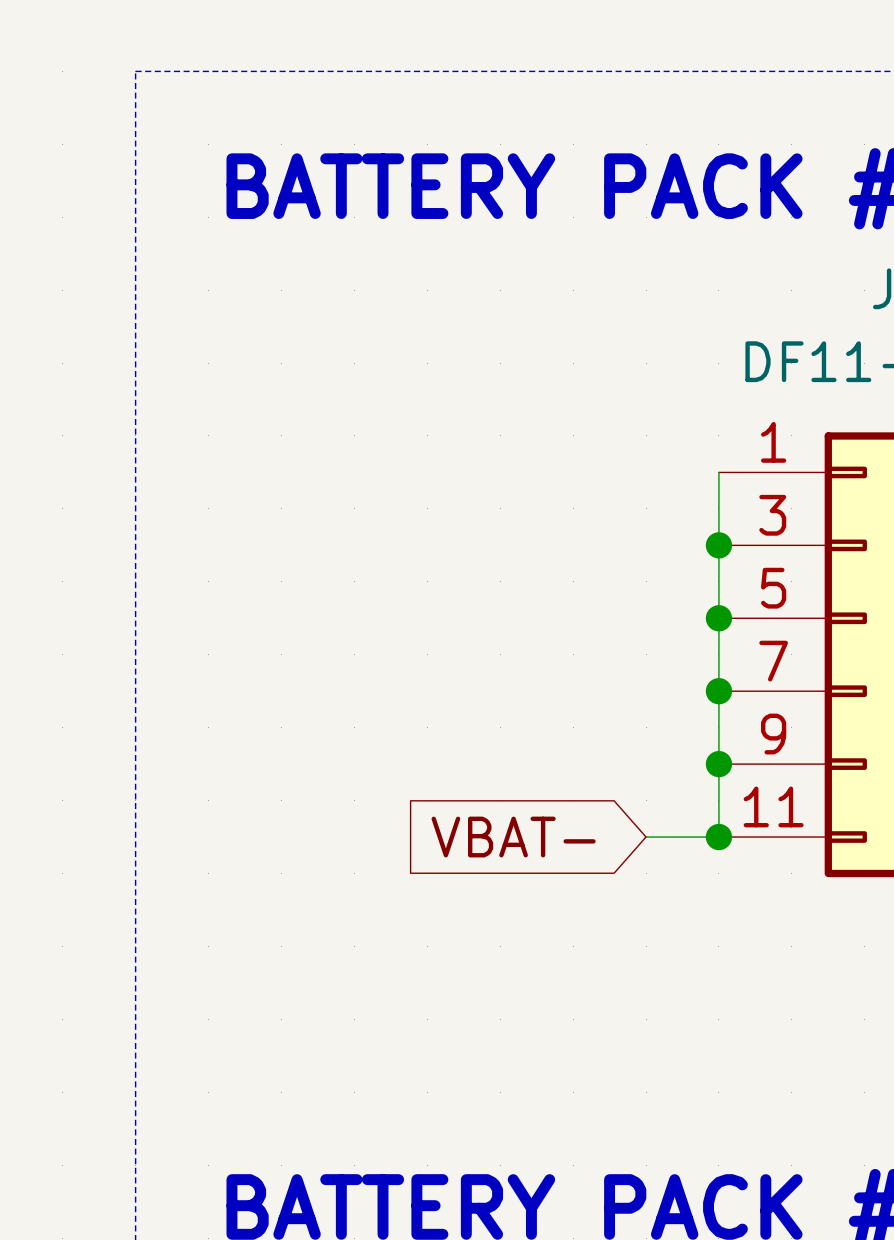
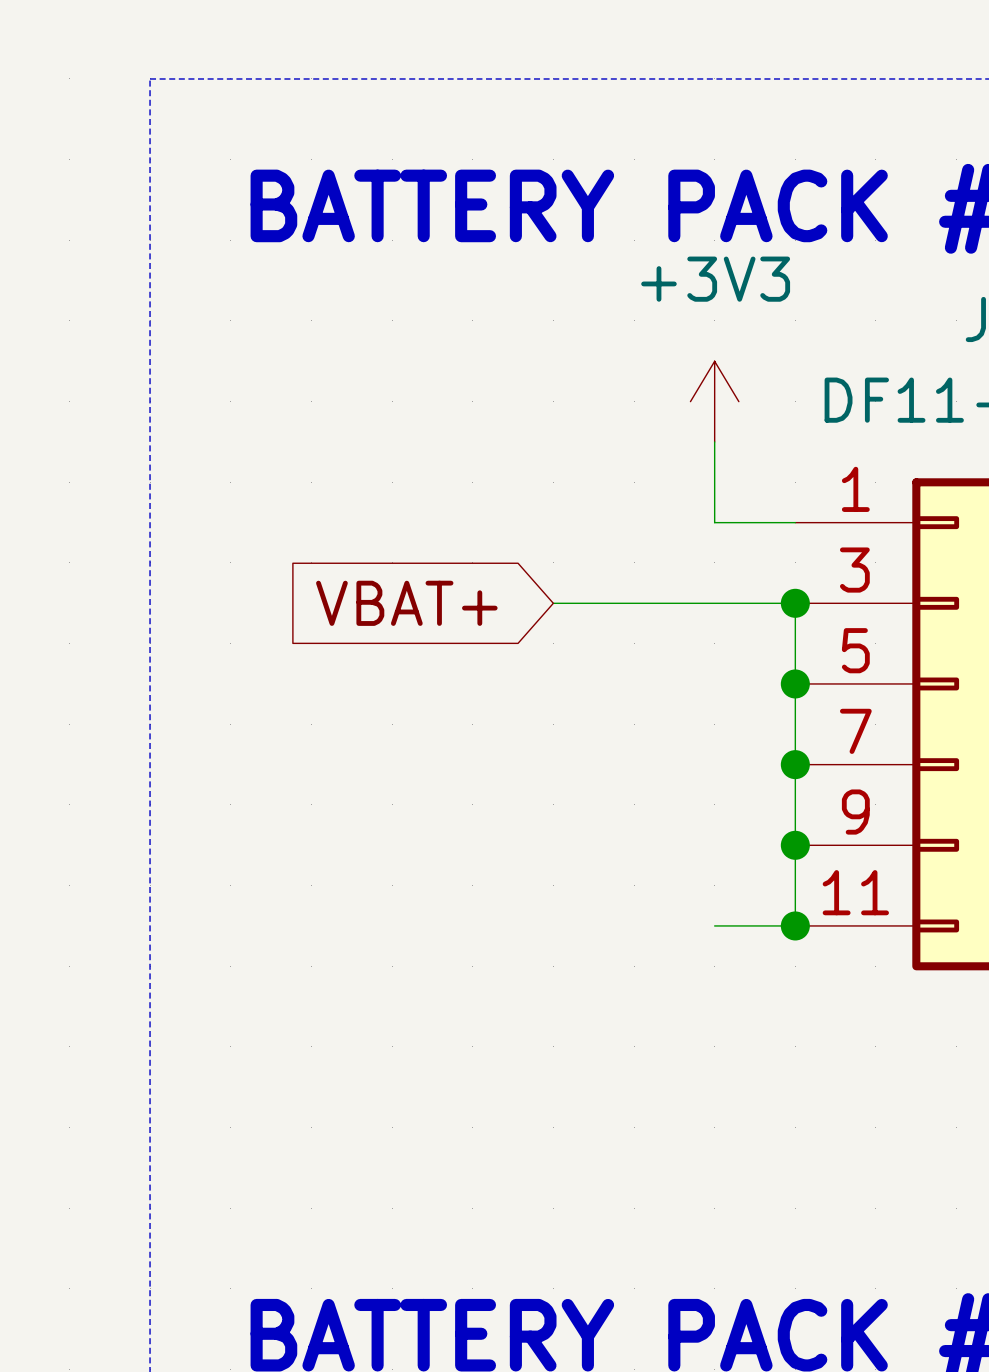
power symbol: none -> +3V3 (714, 401)
wire: (718, 472) (718, 545) -> (795, 522) (714, 522) (714, 441)
global label: none -> VBAT+ (406, 603)
wire: none -> (553, 603) (795, 603)
global label: VBAT- (513, 837) -> none

